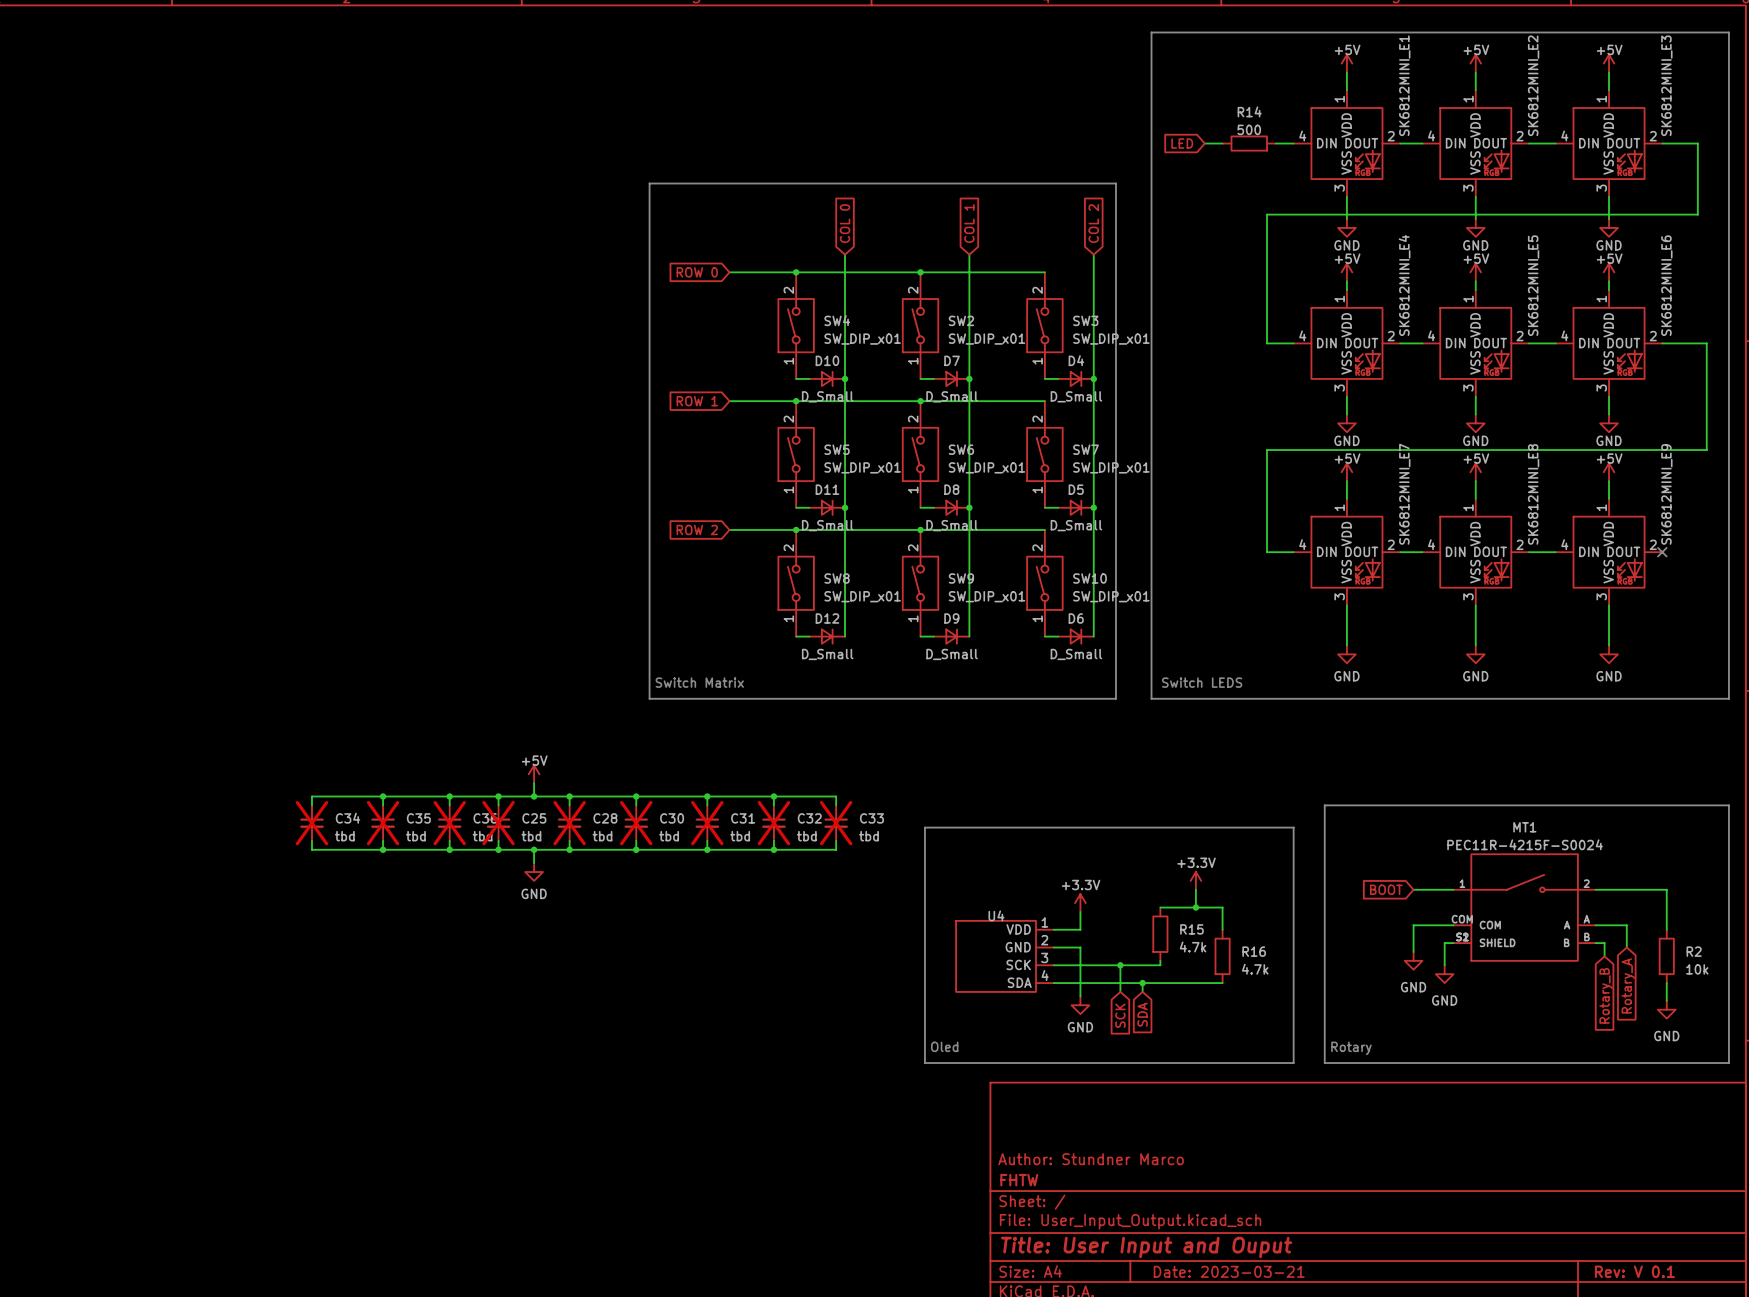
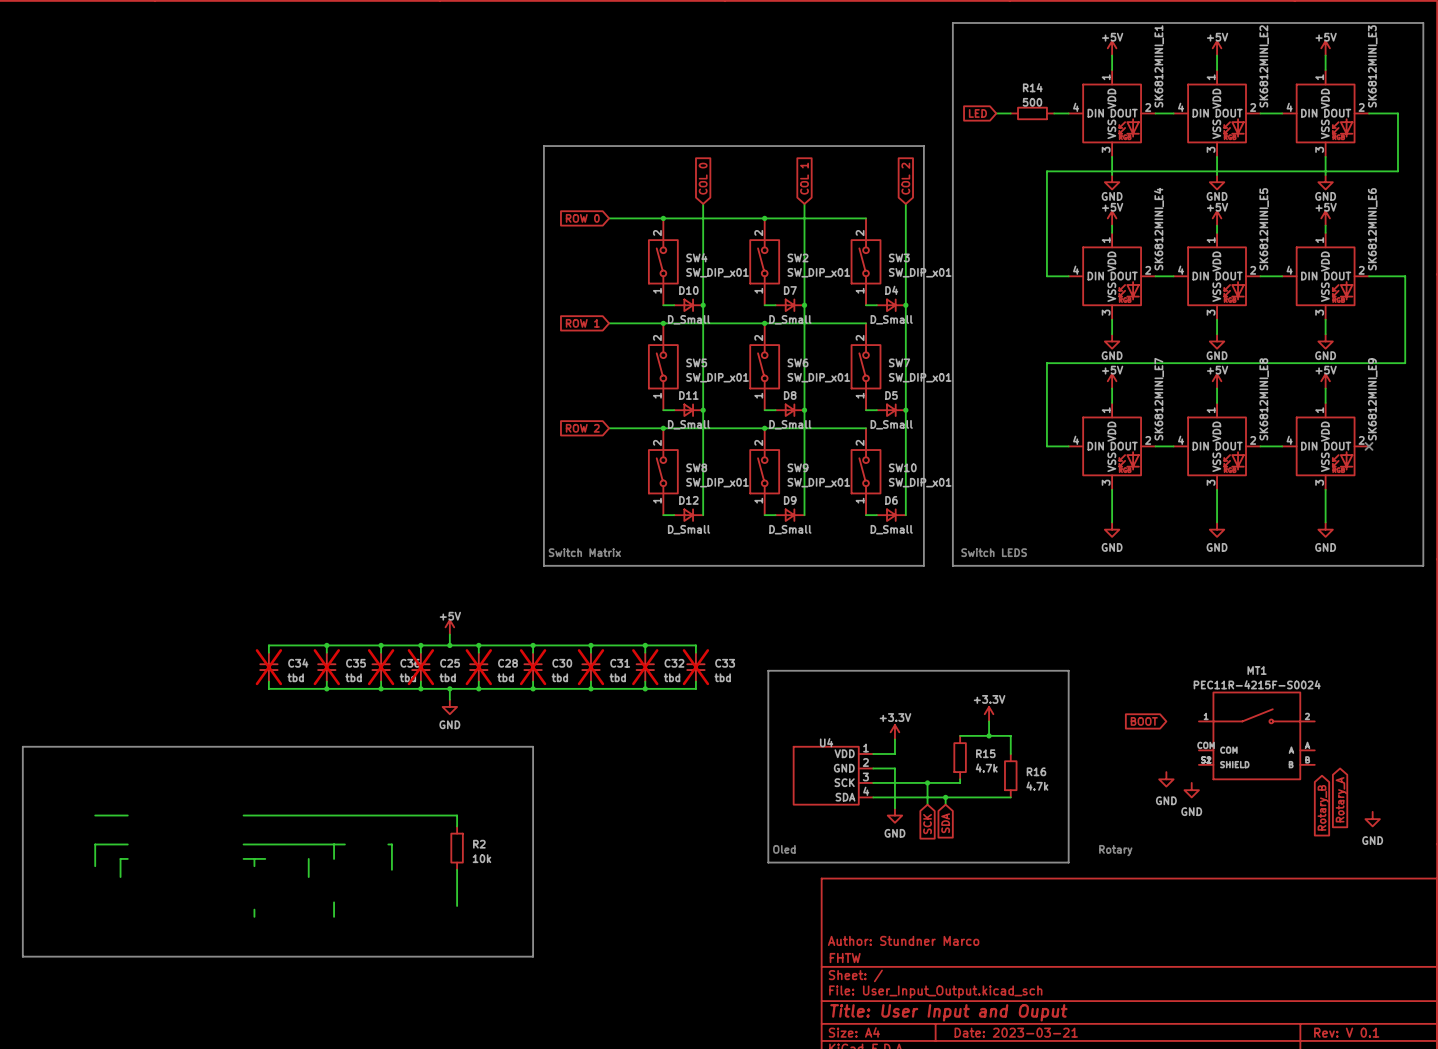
line: (1324, 805) (1728, 805) (1728, 1063) (1324, 1063) (1324, 805) -> none
wire: (1413, 889) (1453, 889) -> none
wire: (1595, 889) (1666, 889) (1666, 929) -> none
line: none -> (22, 746) (533, 746) (533, 956) (22, 956) (22, 746)
wire: (1453, 925) (1413, 925) (1413, 951) -> none
wire: (1595, 925) (1626, 925) (1626, 947) -> none
wire: (1453, 943) (1444, 943) (1444, 965) -> none
wire: (1595, 943) (1604, 943) (1604, 956) -> none
R2 position: (1666, 956) -> (457, 848)
wire: (1666, 983) (1666, 1000) -> none
wire: none -> (95, 815) (127, 815)
wire: none -> (243, 815) (457, 815) (457, 826)
wire: none -> (127, 844) (95, 844) (95, 866)
wire: none -> (243, 844) (344, 844)
wire: none -> (334, 844) (334, 858)
wire: none -> (388, 844) (391, 844) (391, 869)
wire: none -> (127, 858) (120, 858) (120, 877)
wire: none -> (243, 858) (265, 858)
wire: none -> (254, 858) (254, 866)
wire: none -> (308, 858) (308, 877)
wire: none -> (457, 869) (457, 905)
wire: none -> (334, 902) (334, 916)
wire: none -> (254, 909) (254, 916)

